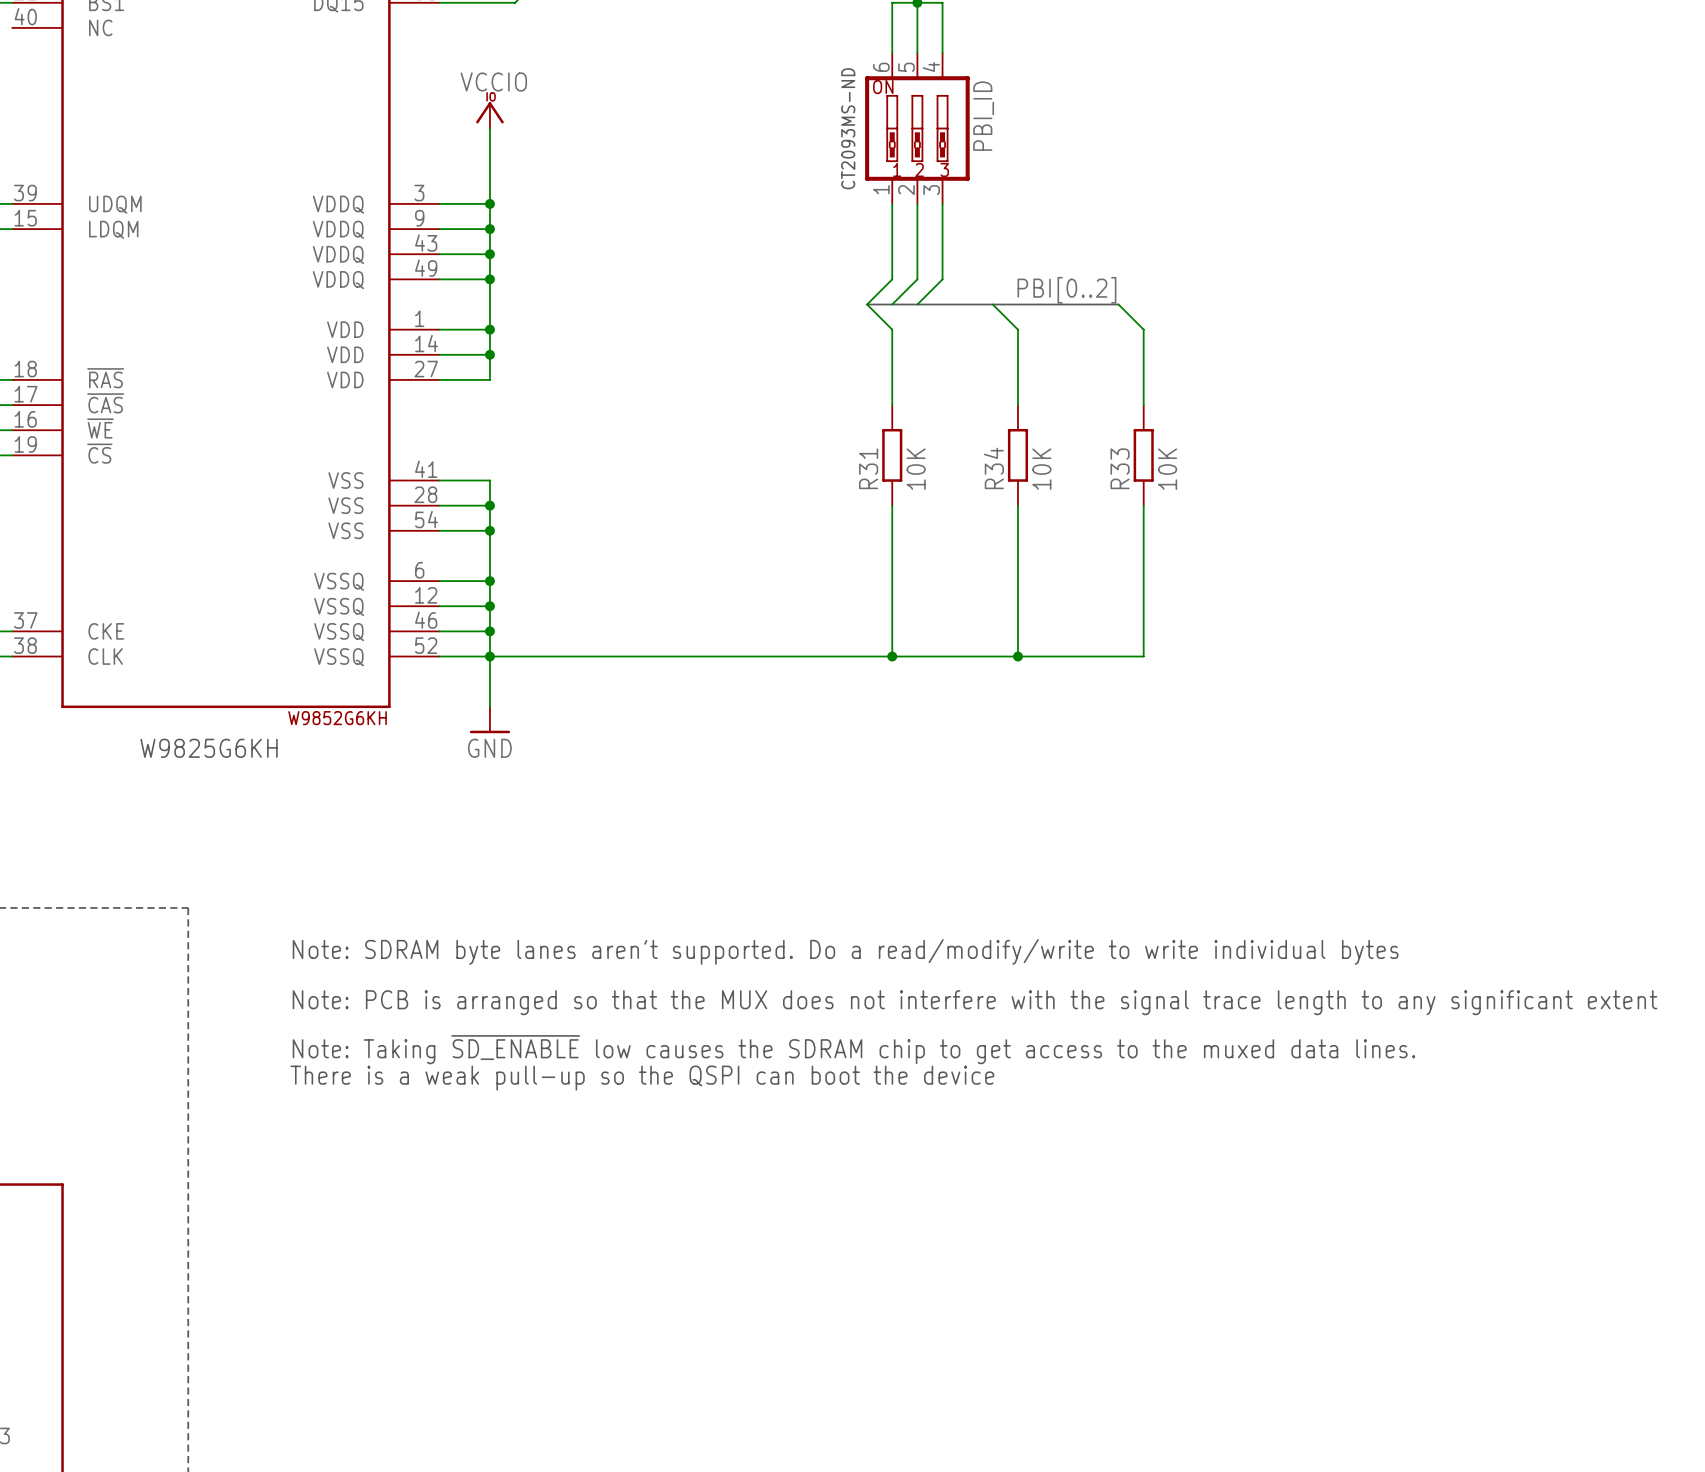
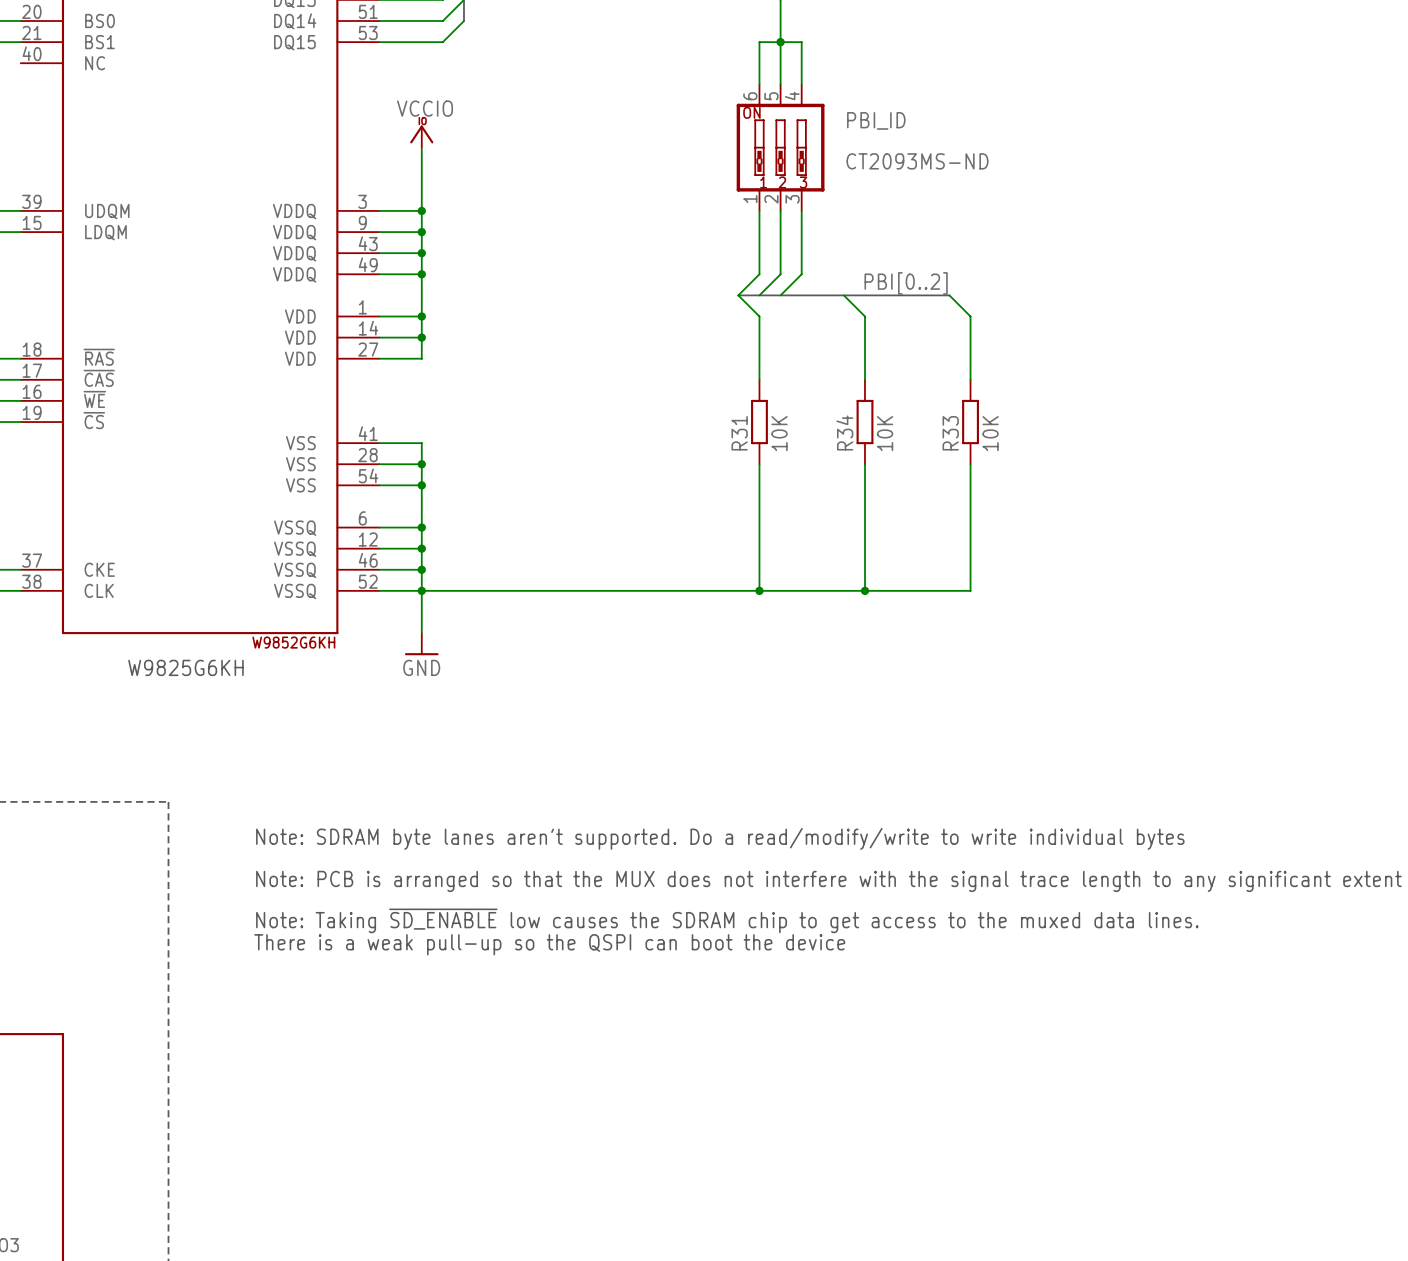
PBI_ID name rotation: 0° (983, 116) -> 90° clockwise (876, 120)
text: CT2093MS-ND (848, 128) -> none
PBI_ID value: none -> CT2093MS-ND (917, 161)

